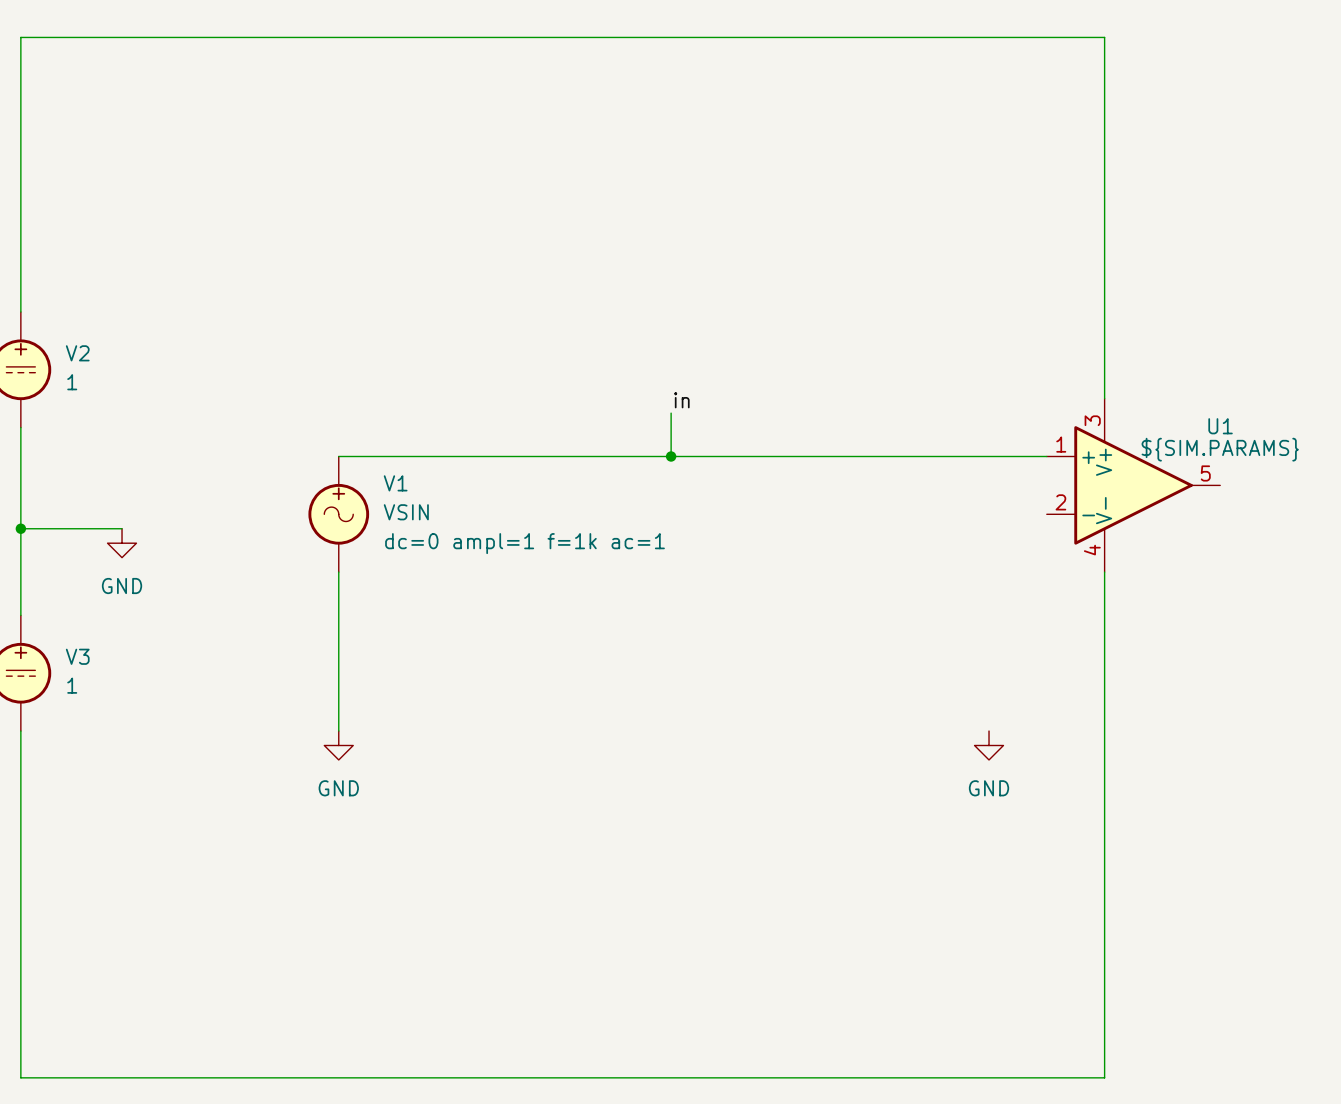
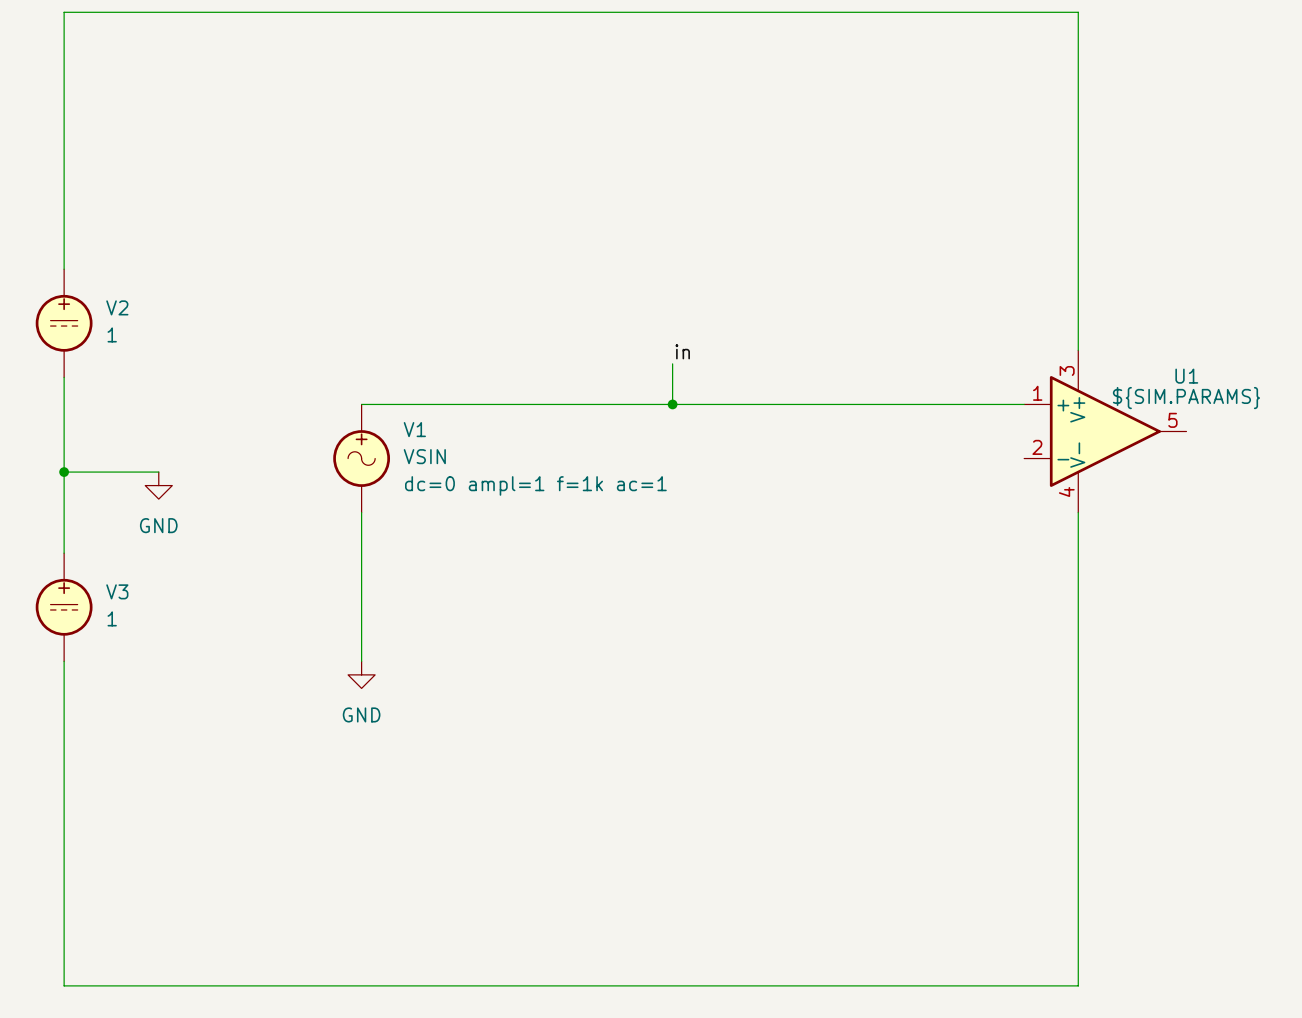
power symbol: GND (989, 745) -> none

